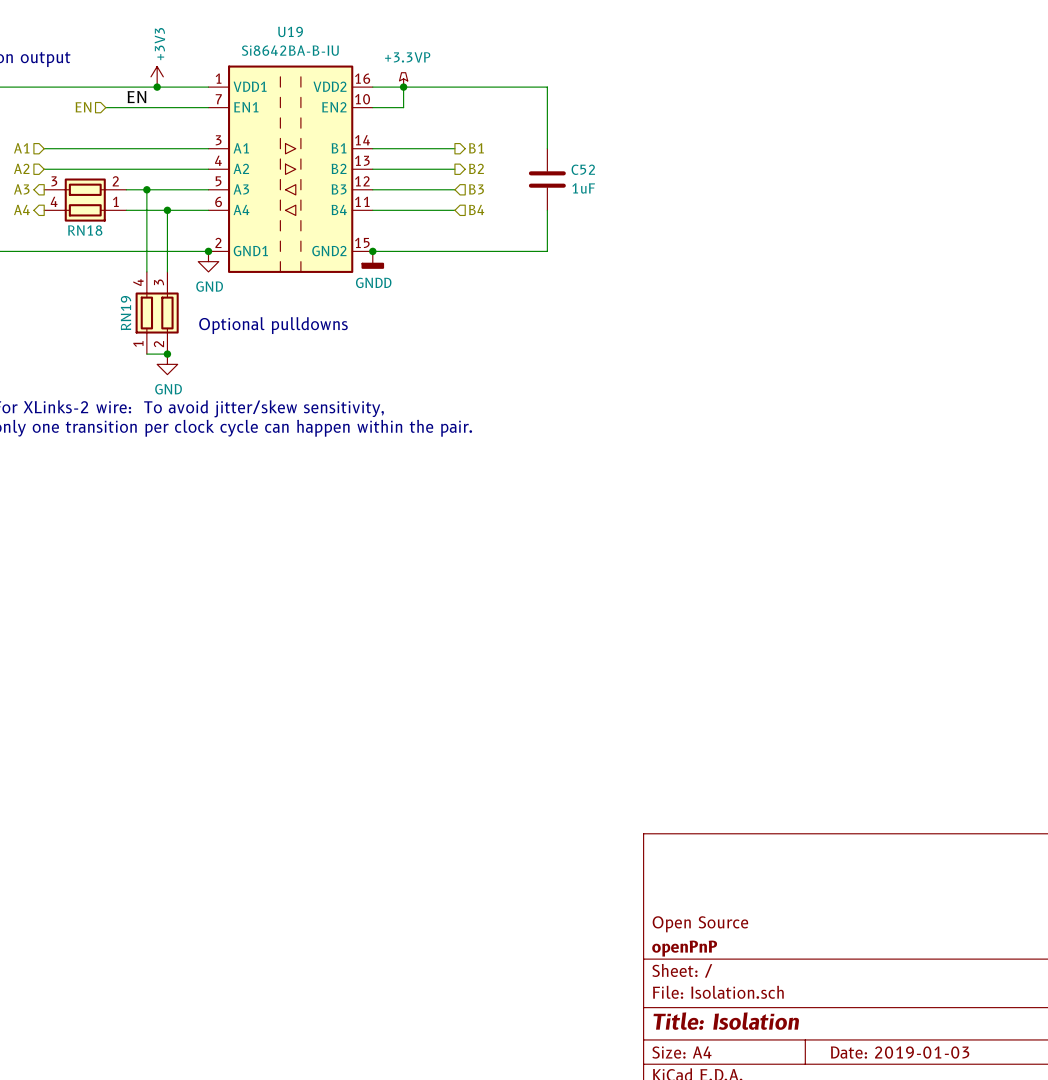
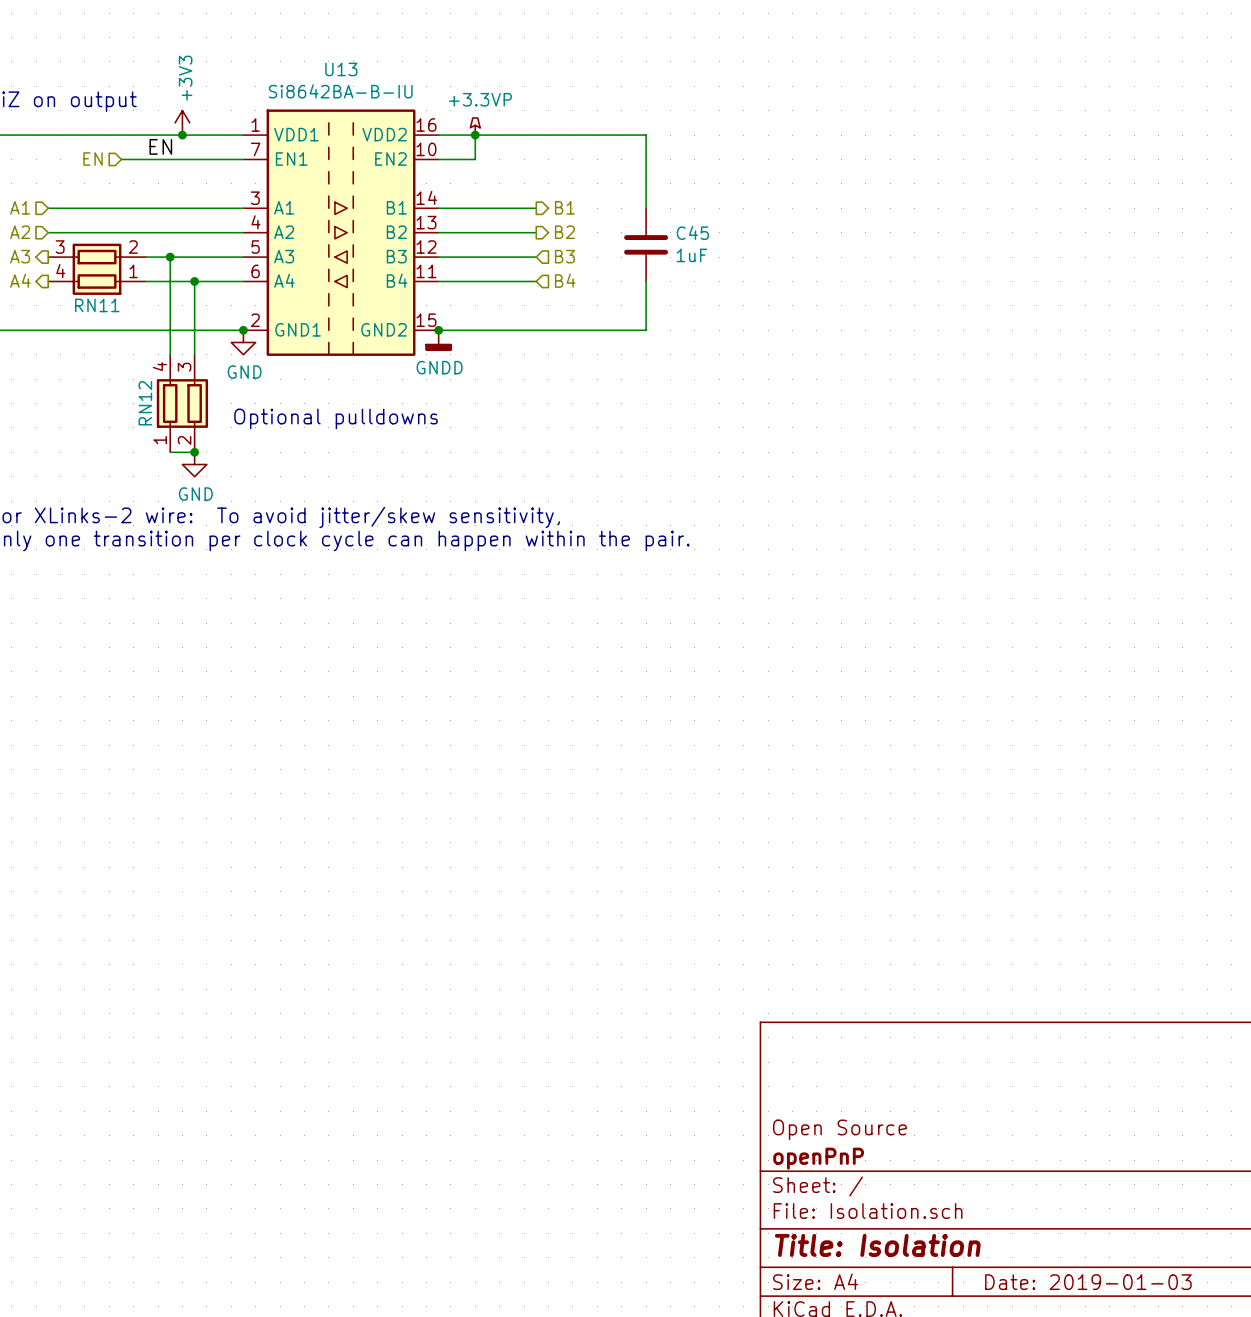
U19 name: U19 (290, 31) -> U13 (341, 69)
C52 name: C52 (583, 169) -> C45 (692, 232)
RN18 name: RN18 (85, 230) -> RN11 (97, 305)
RN19 name: RN19 (126, 313) -> RN12 (145, 403)

